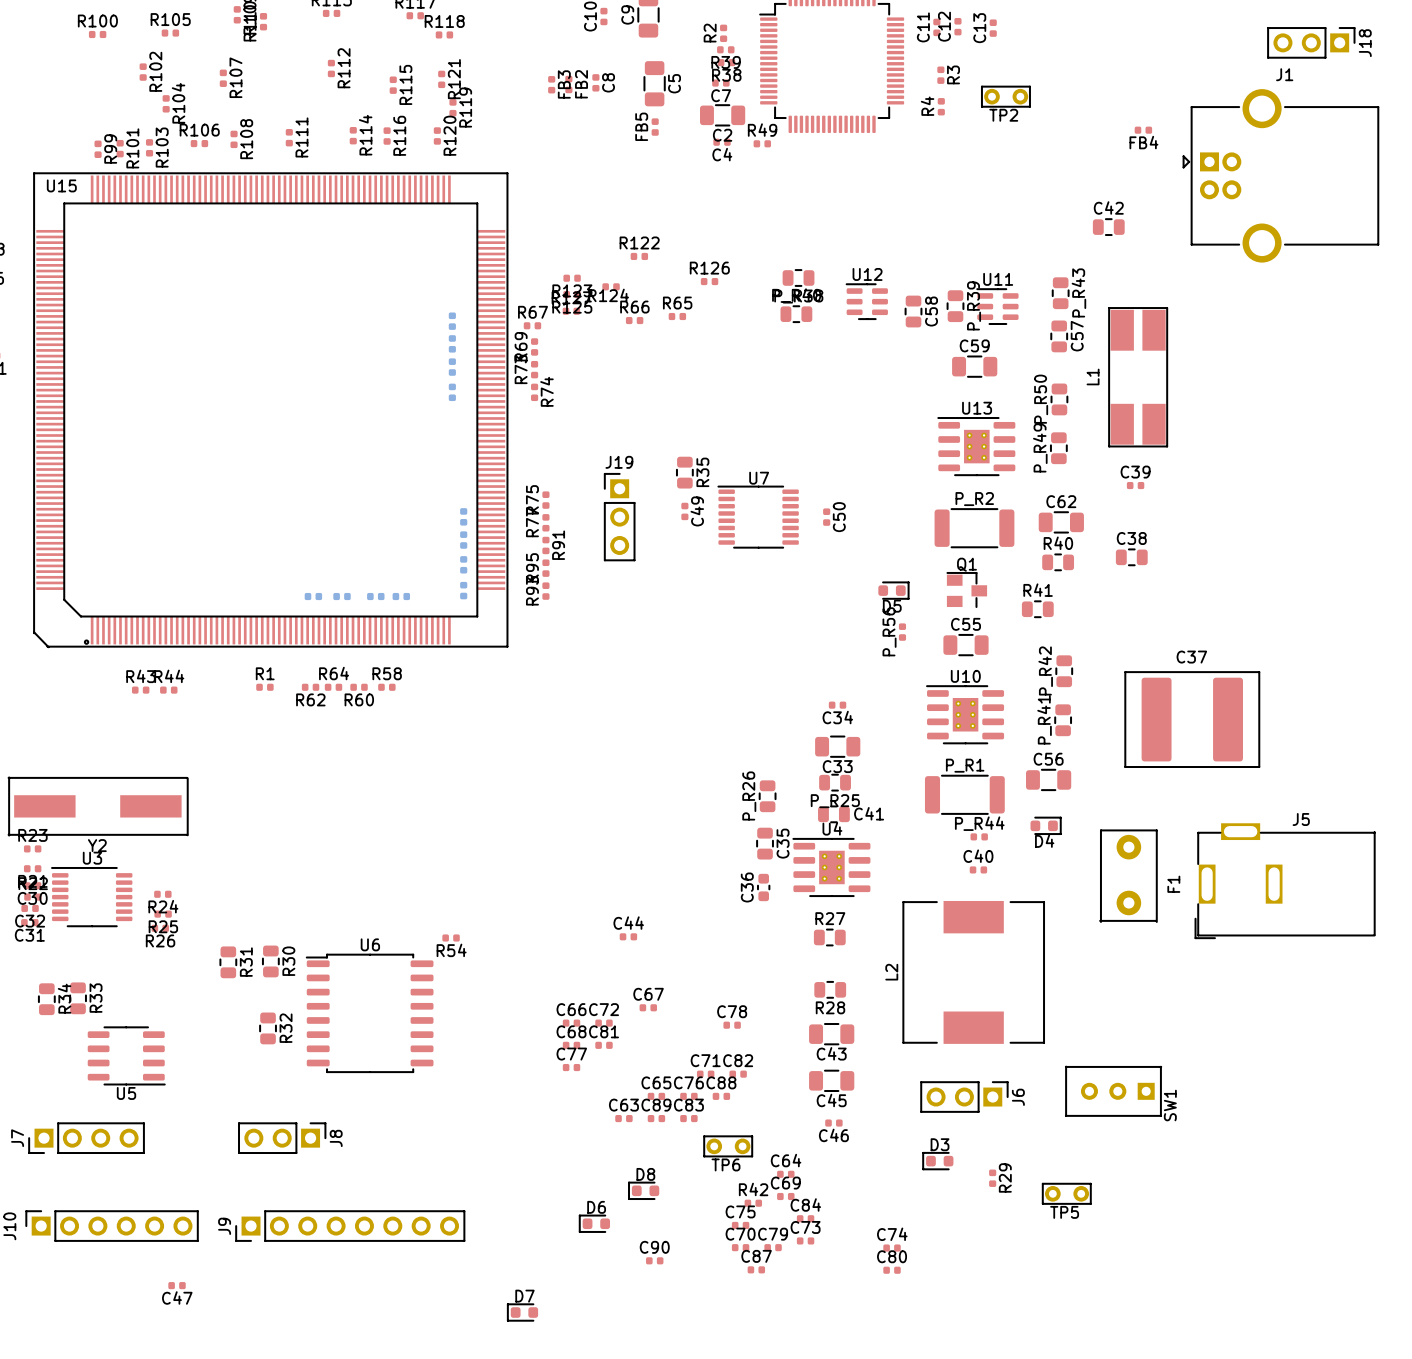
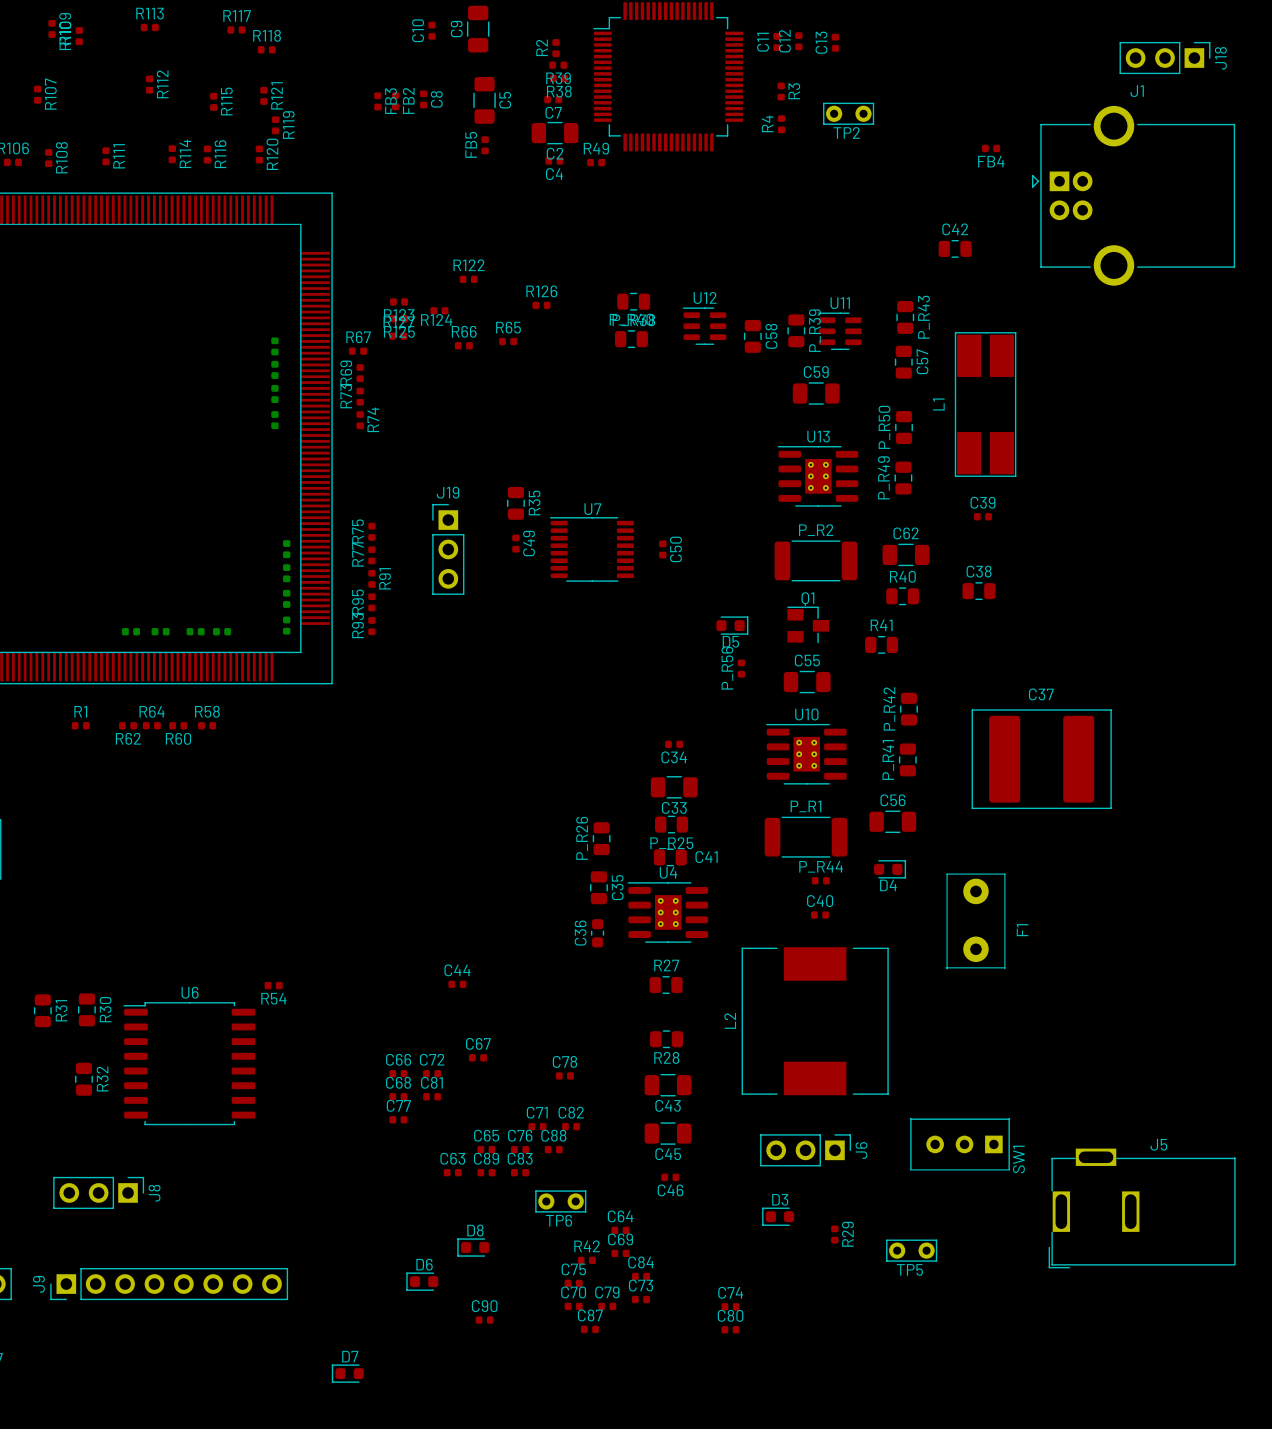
J5 position: (1285, 881) -> (1142, 1208)

